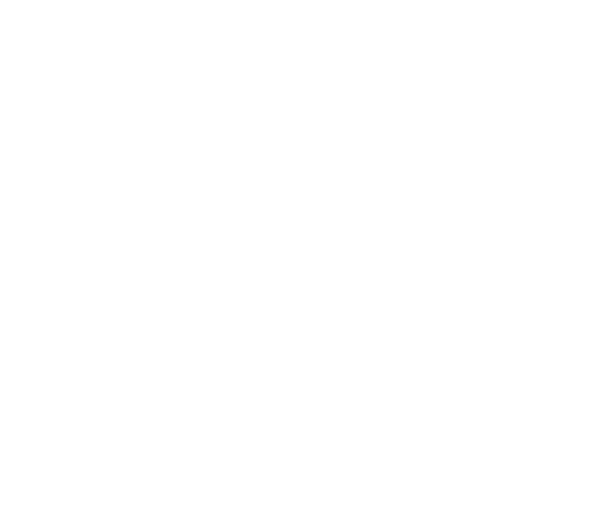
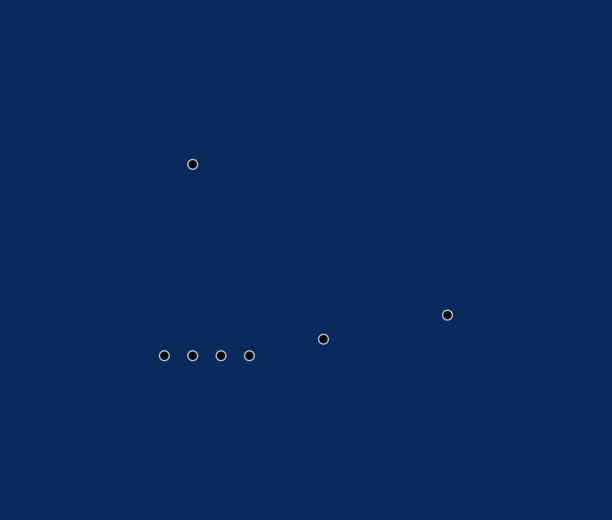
via: none -> (192, 164)
via: none -> (447, 315)
via: none -> (323, 339)
via: none -> (164, 355)
via: none -> (192, 355)
via: none -> (221, 355)
via: none -> (249, 355)

